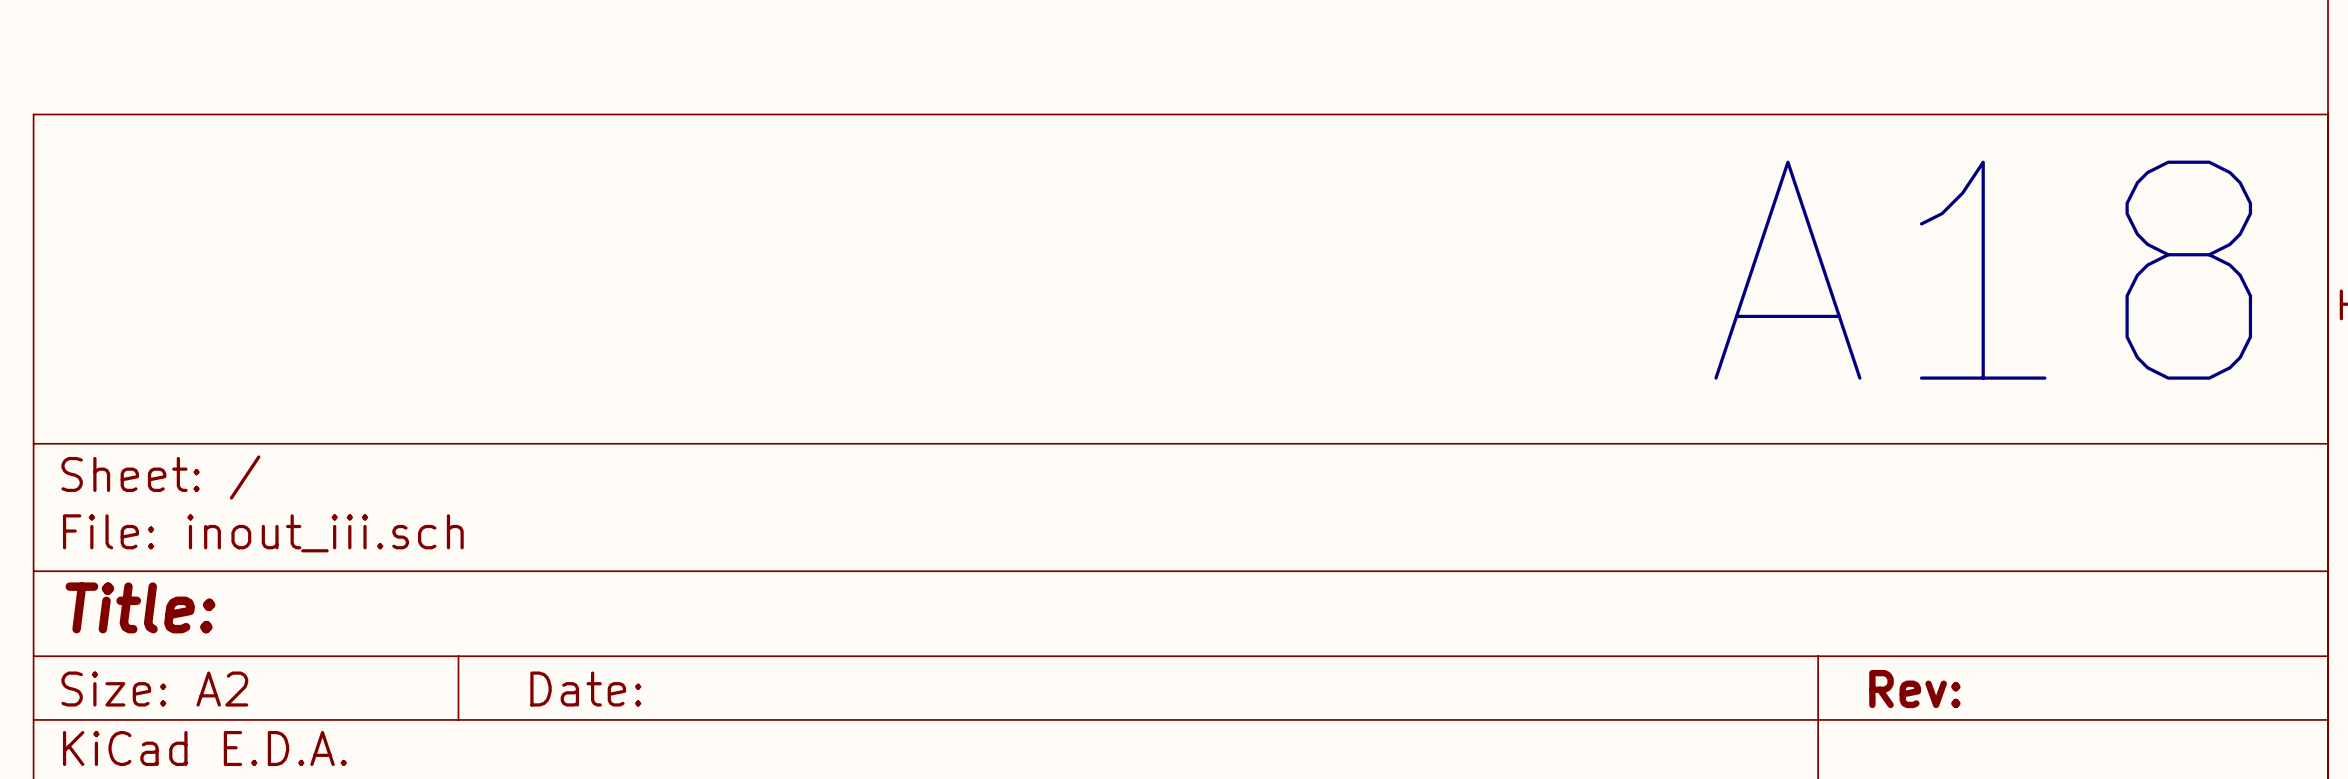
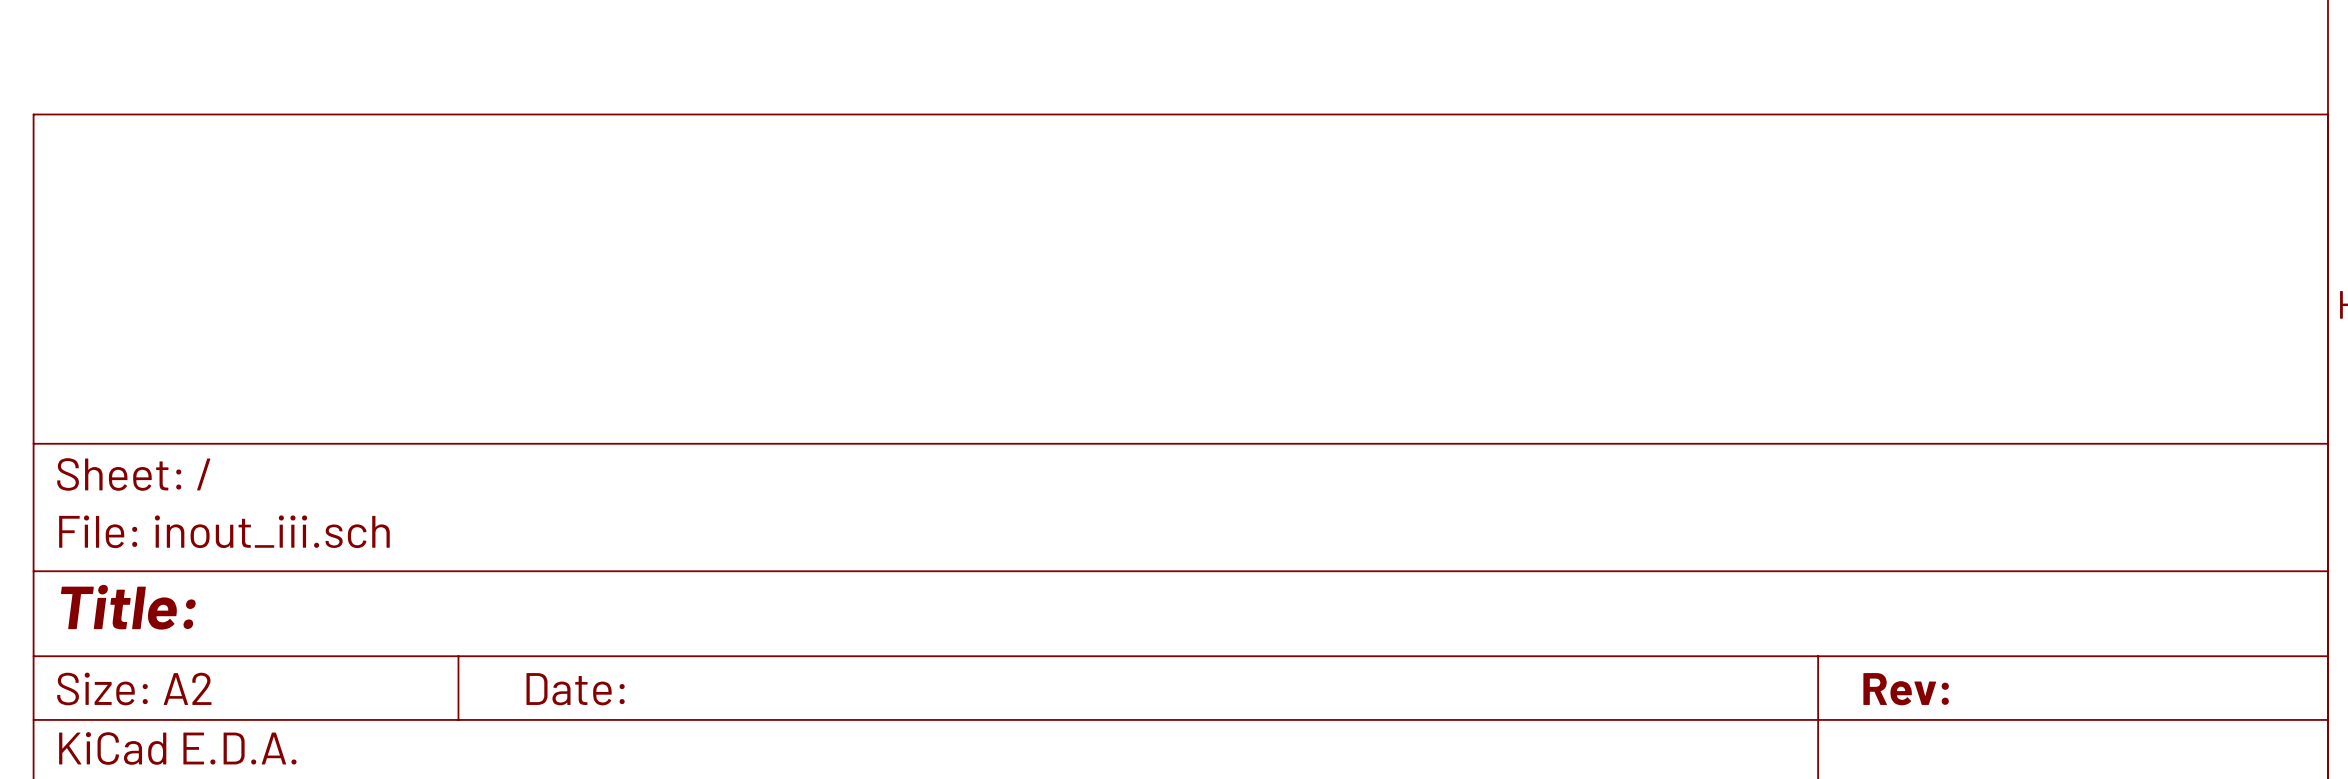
text: A18 (1983, 270) -> none

